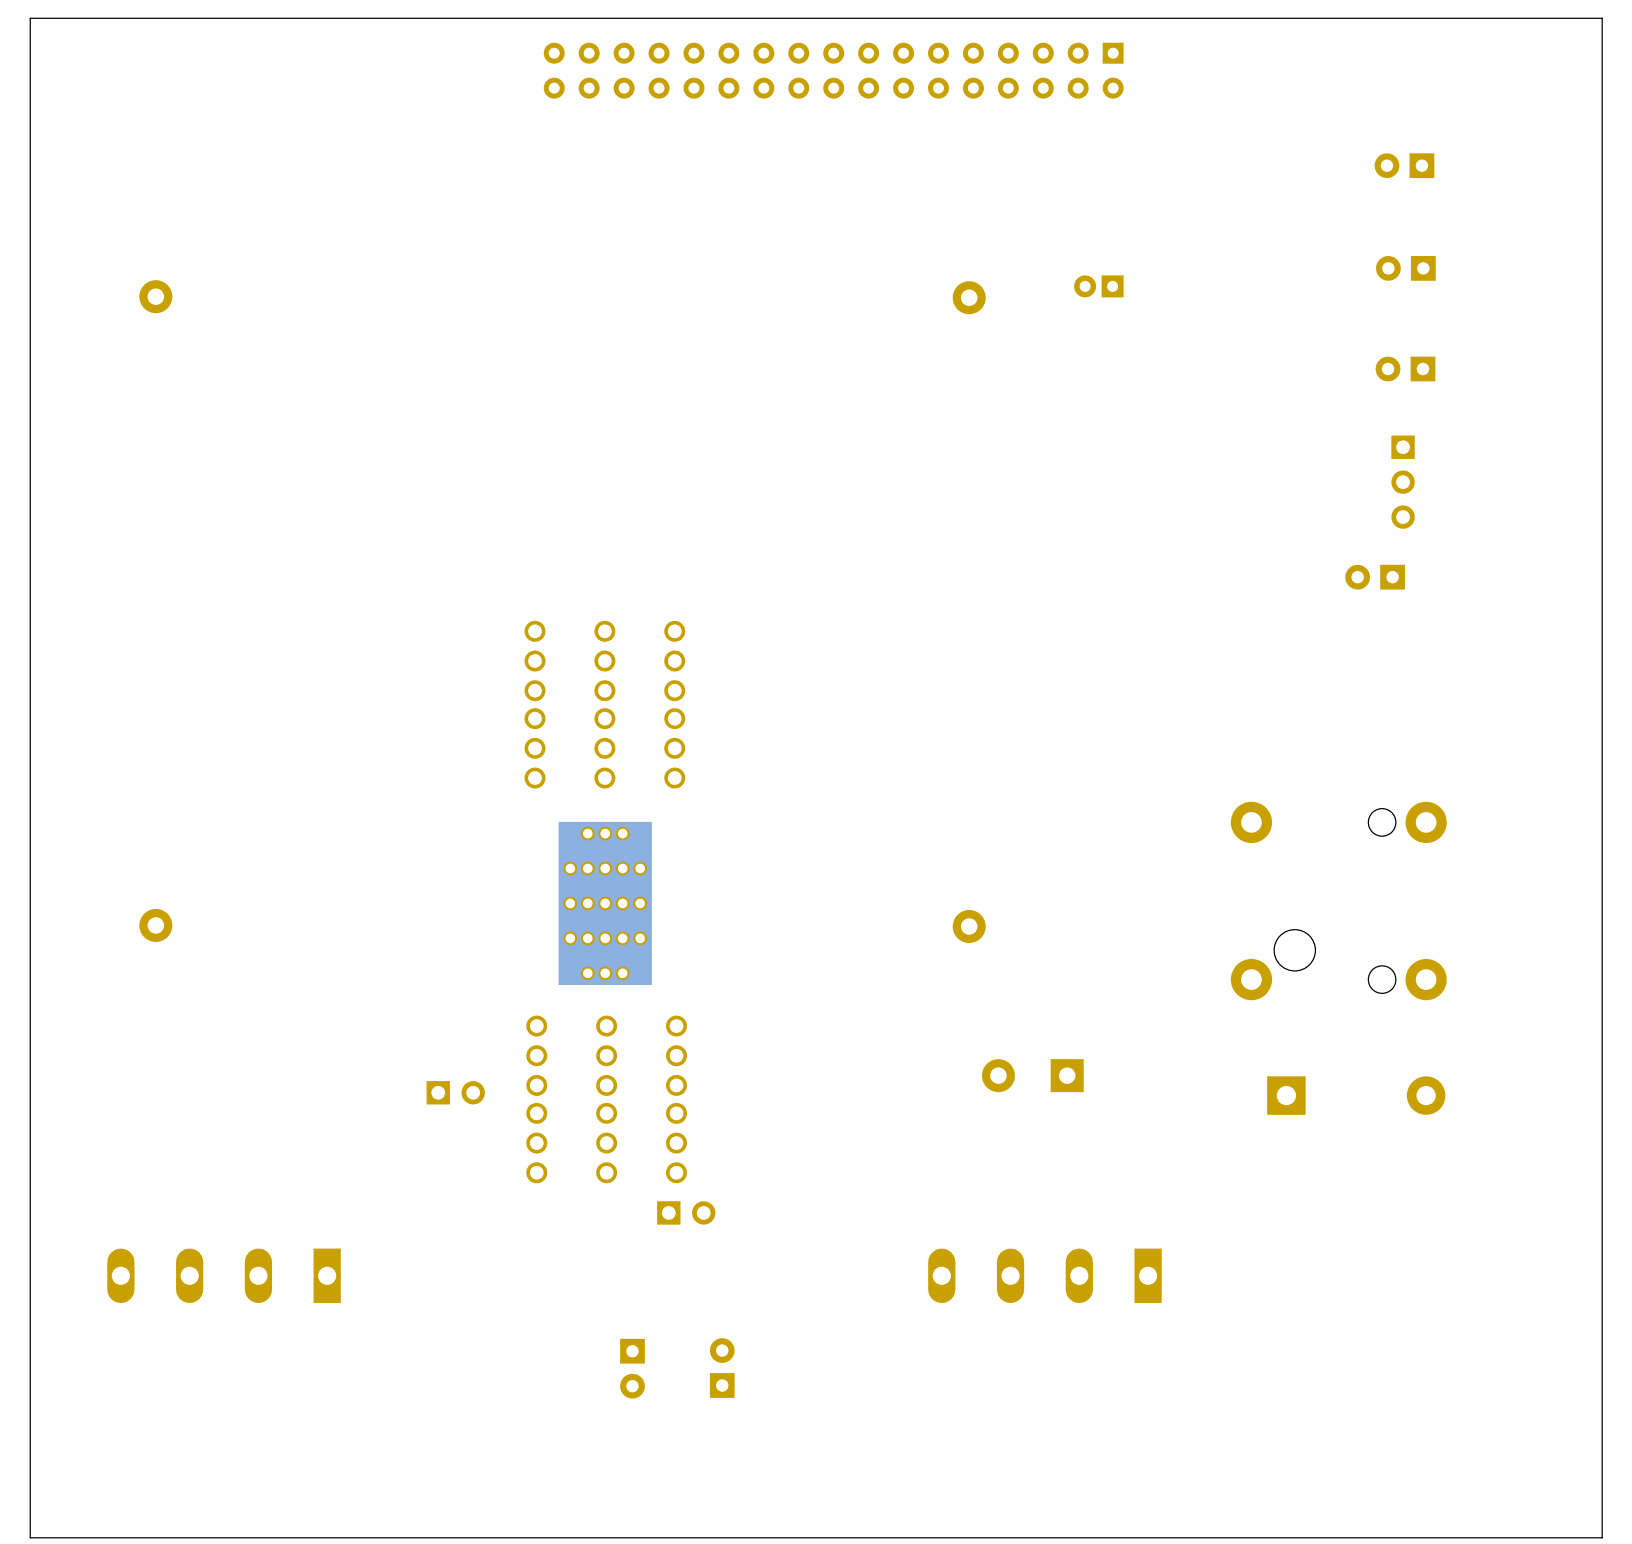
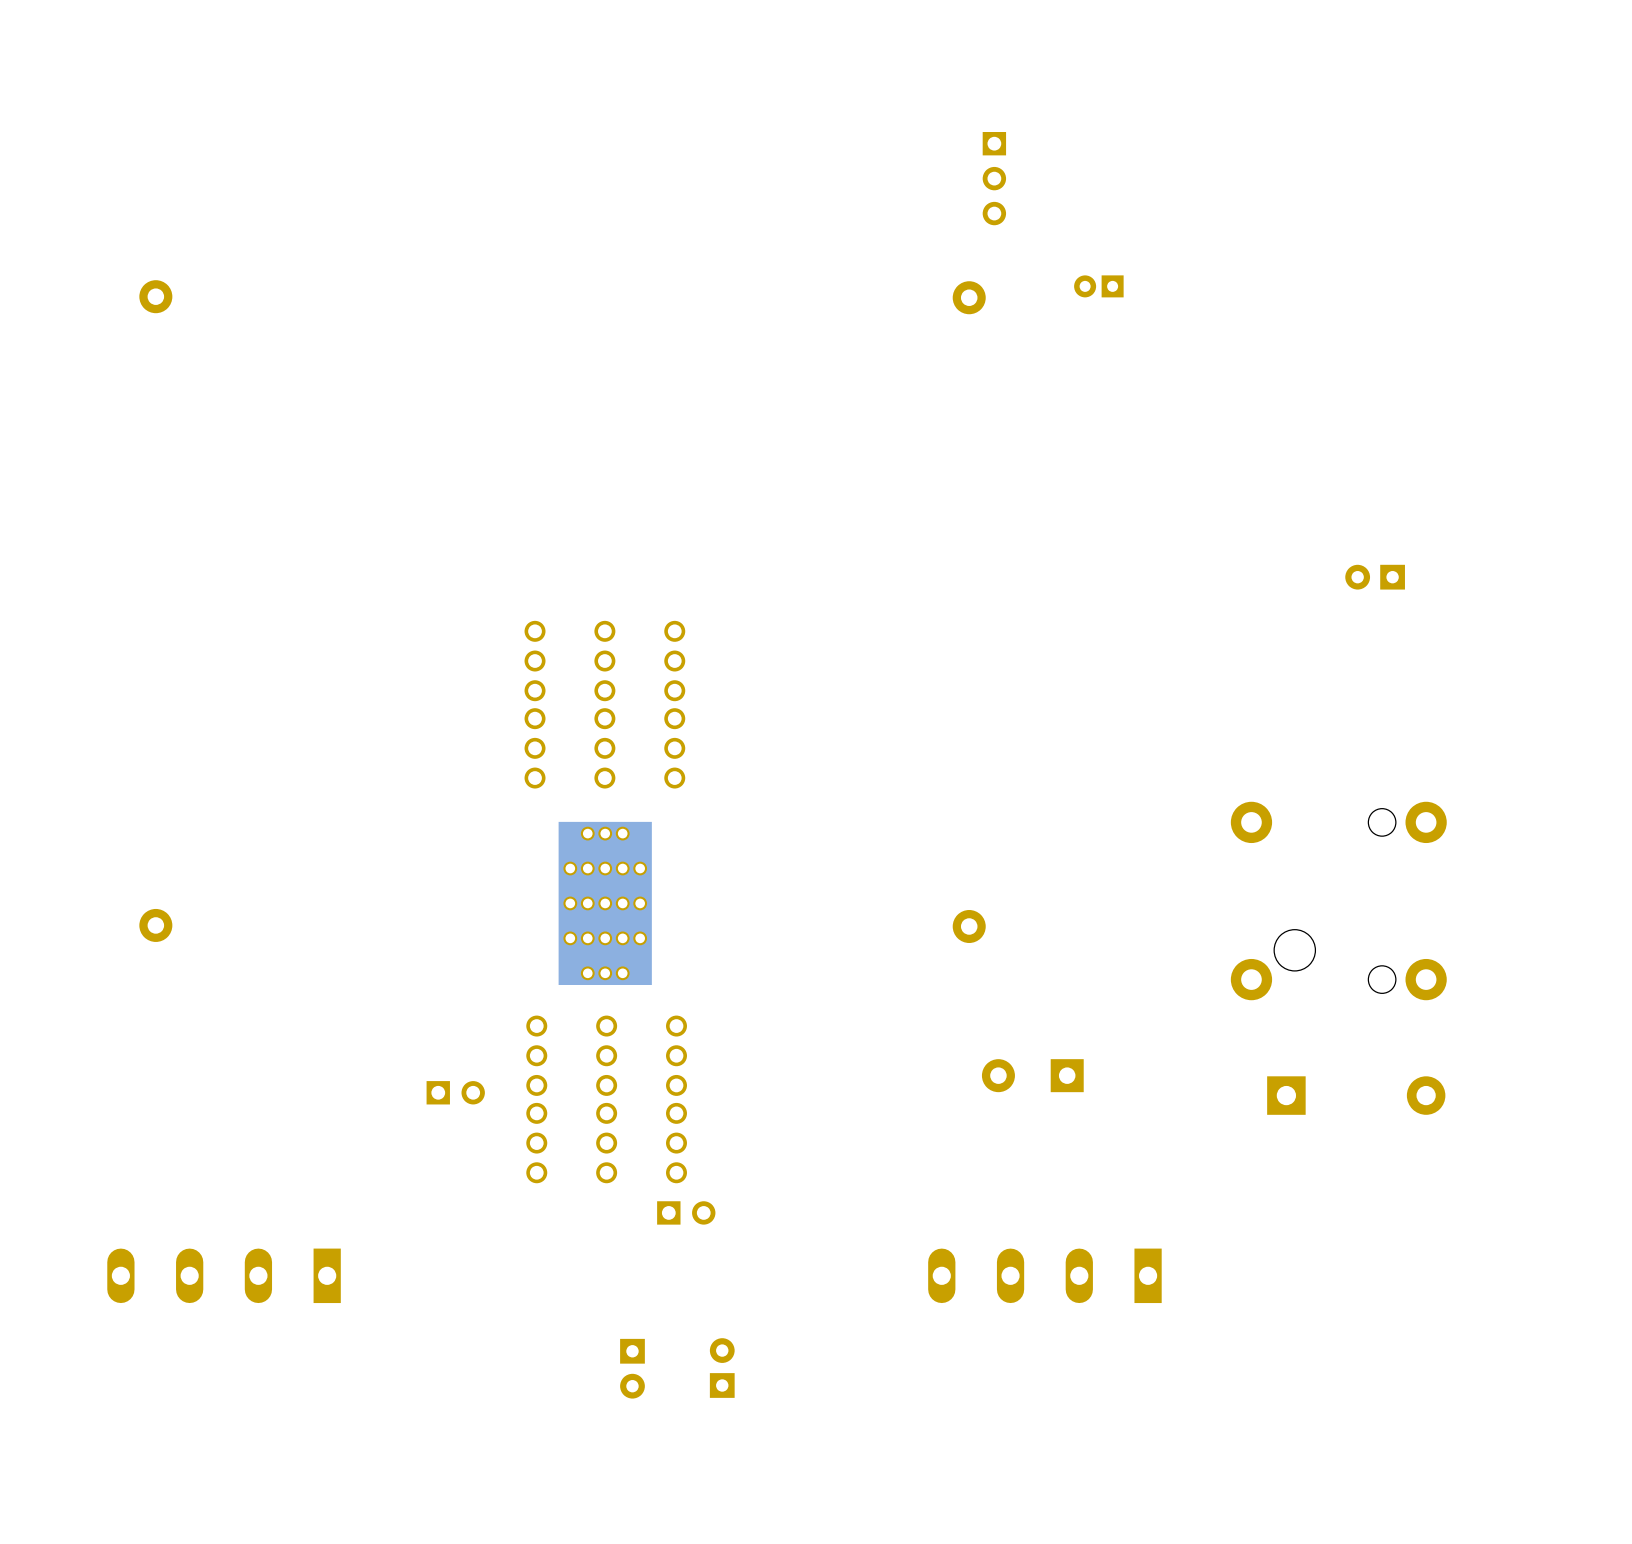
board edge: (1602, 18) (30, 18) (30, 1537) (1602, 1537) (1602, 18) -> none
part: (833, 70) -> none
part: (1404, 165) -> none
part: none -> (994, 178)
part: (1405, 268) -> none
part: (1405, 368) -> none
part: (1403, 482) -> none

